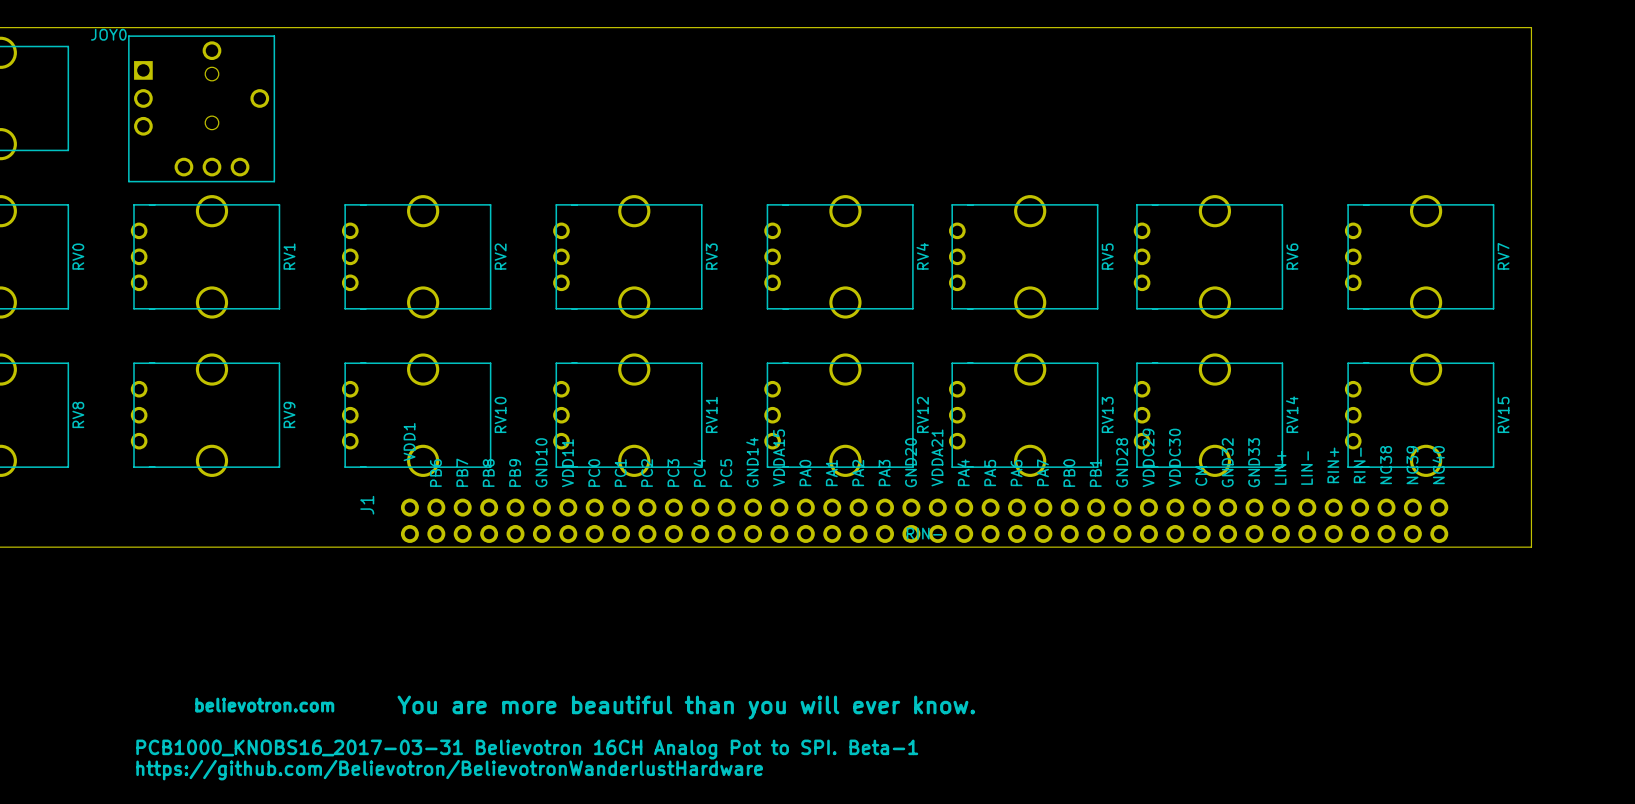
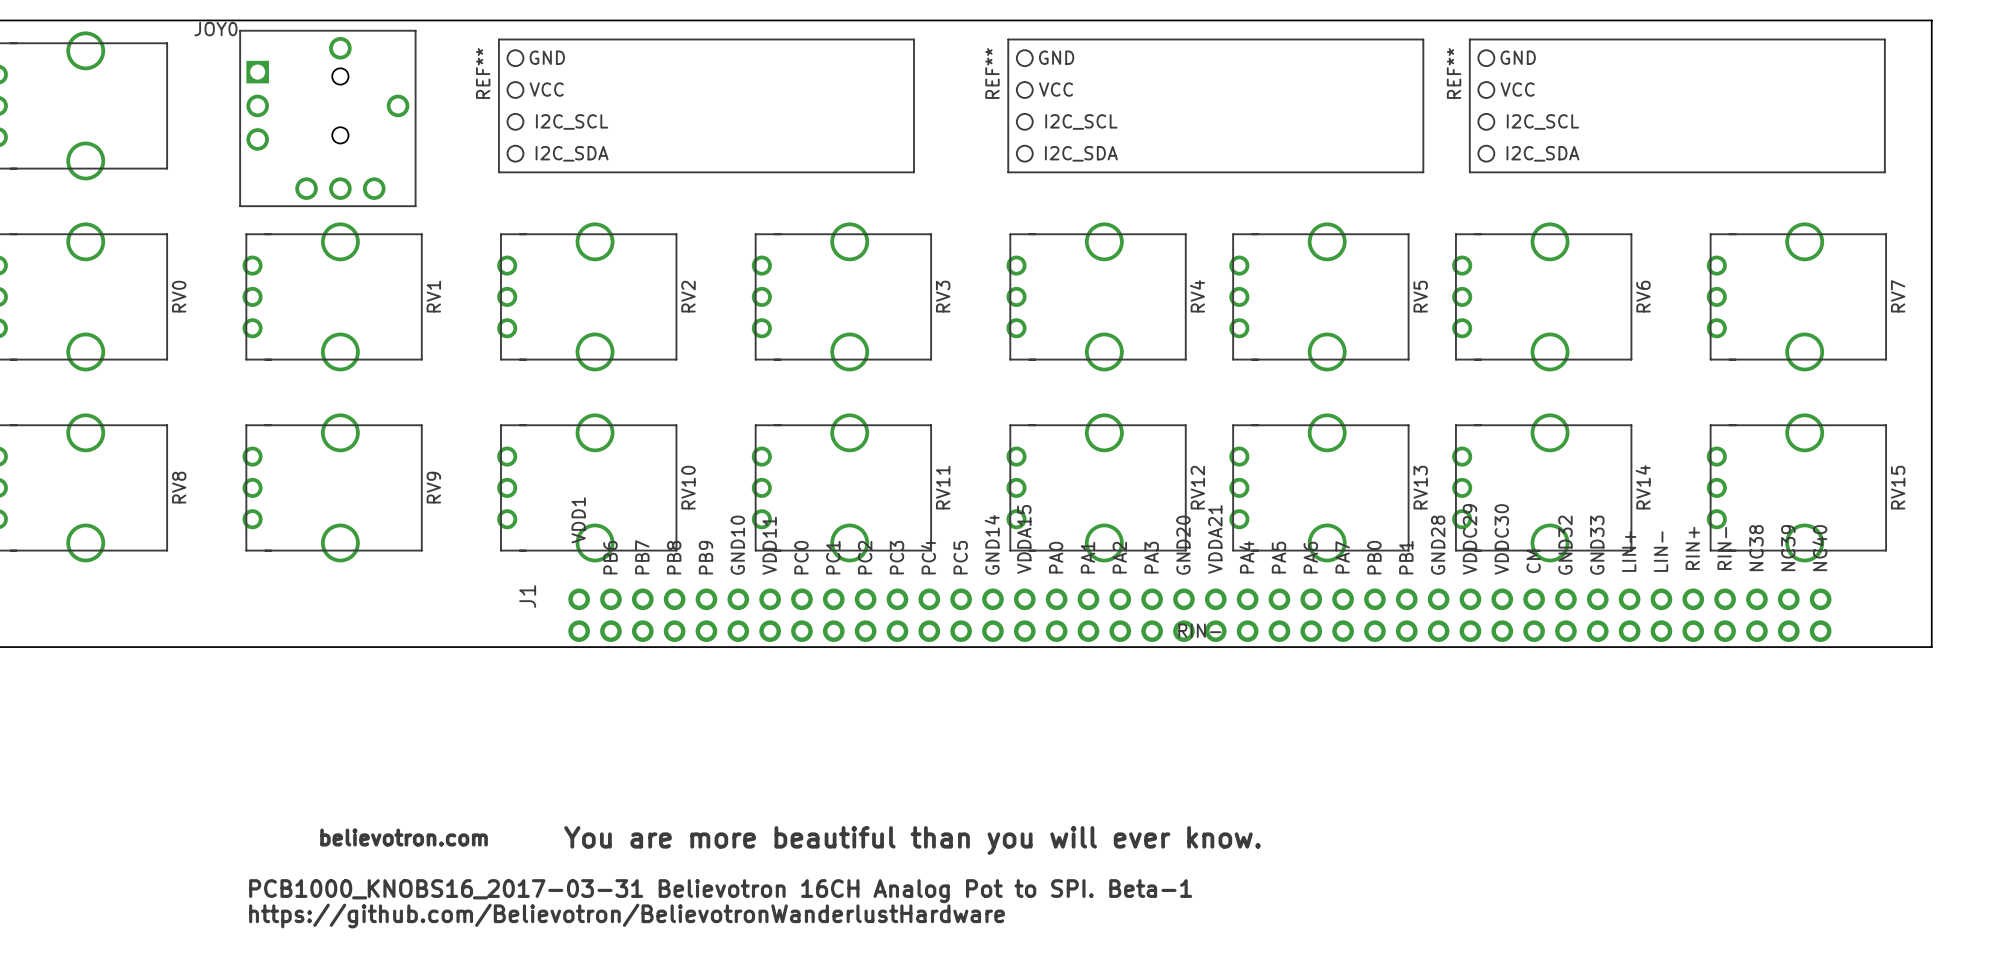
REF**: none -> (706, 105)
REF**: none -> (1215, 105)
REF**: none -> (1677, 105)

